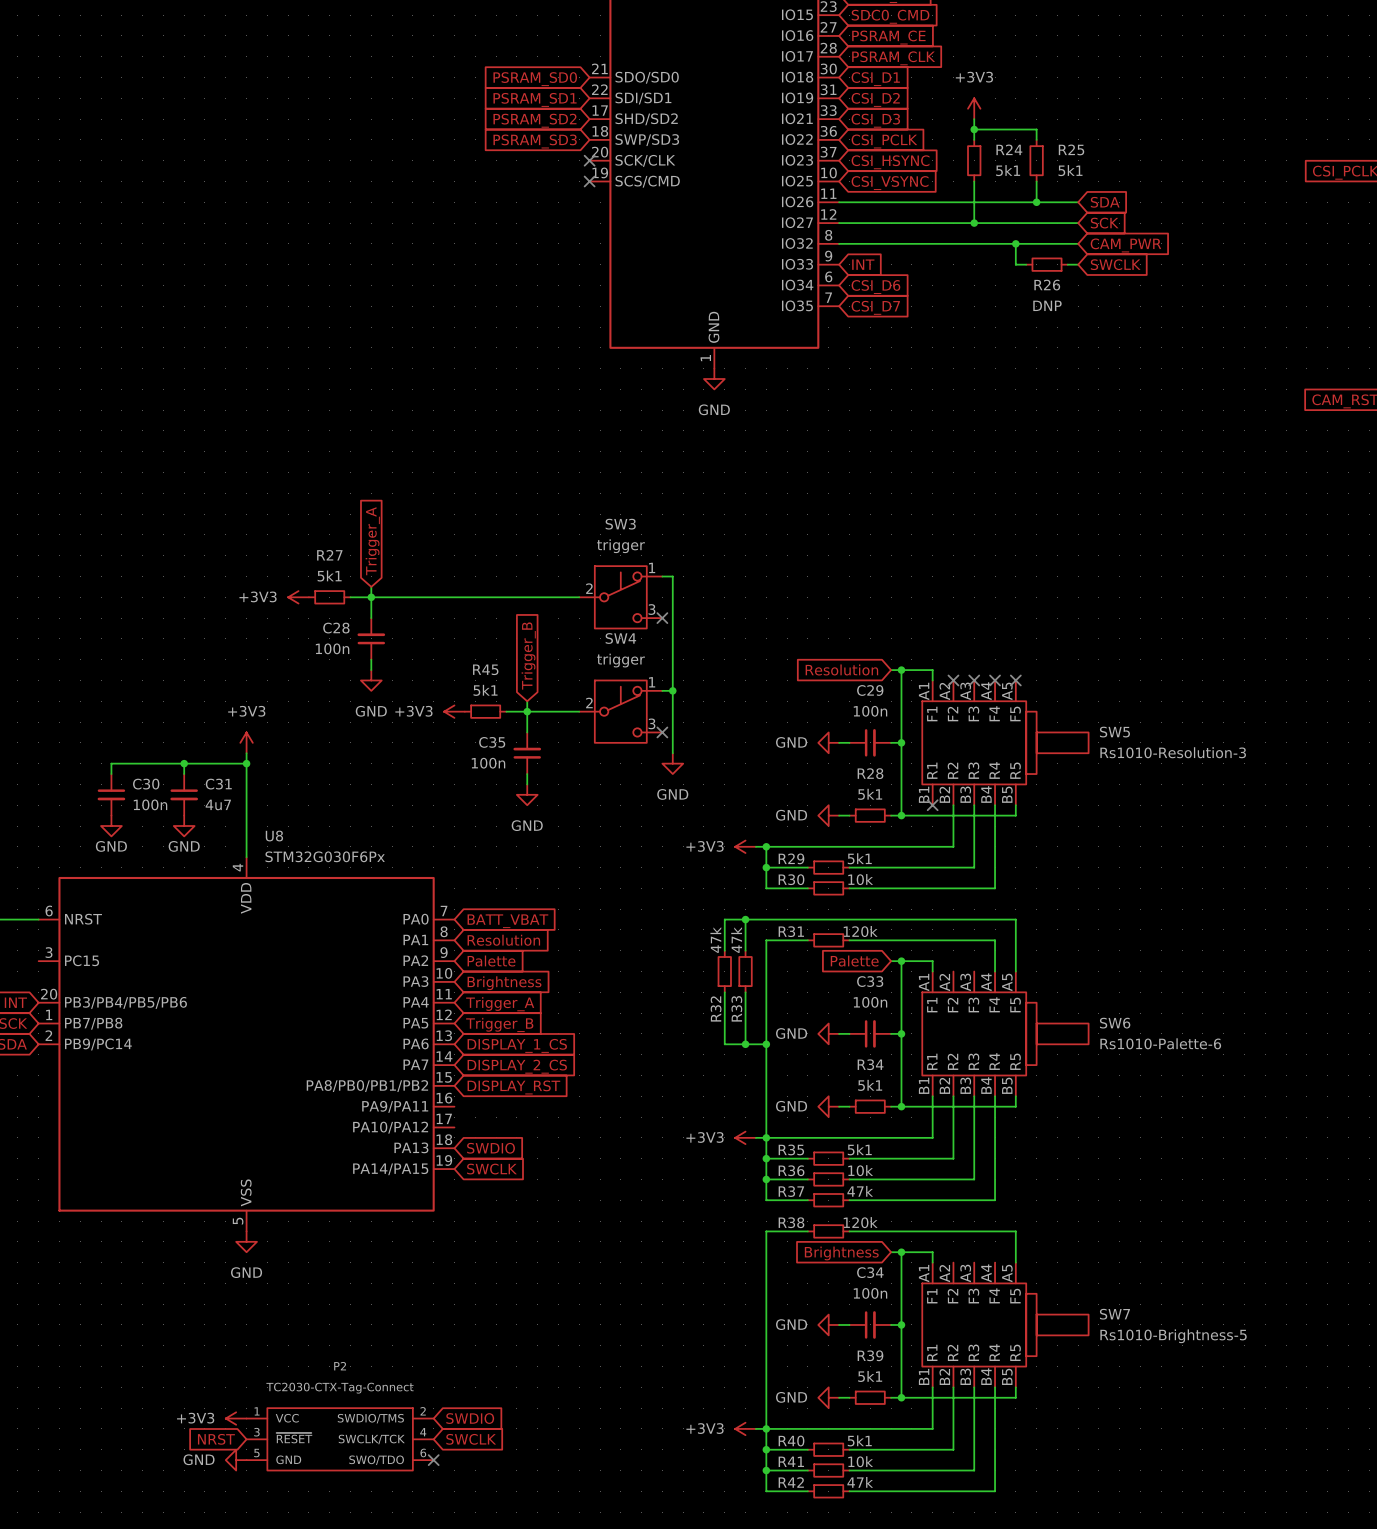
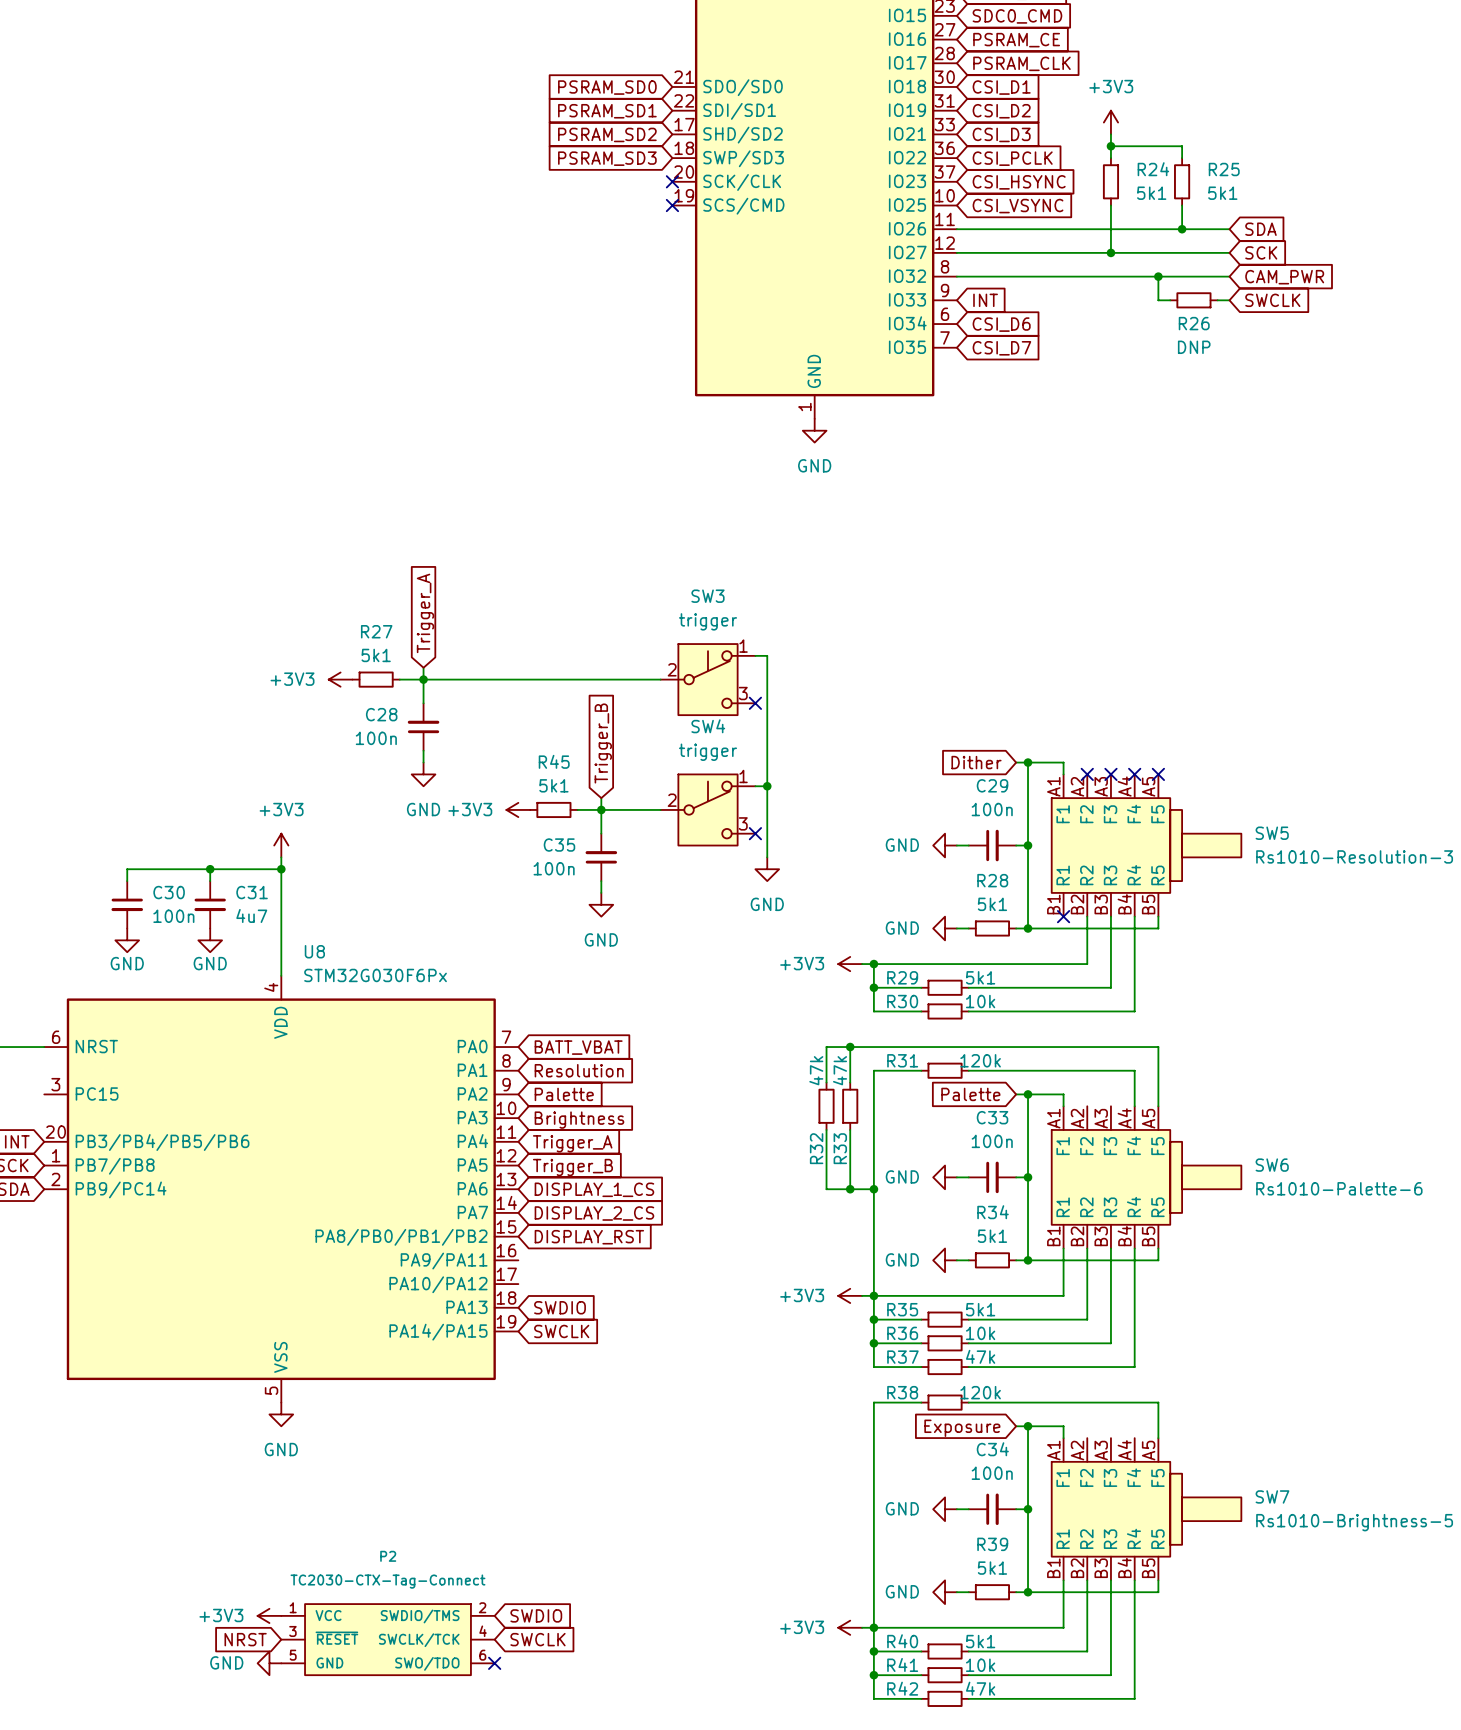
global label: Resolution (841, 669) -> Dither (976, 762)
global label: Brightness (841, 1253) -> Exposure (962, 1428)

